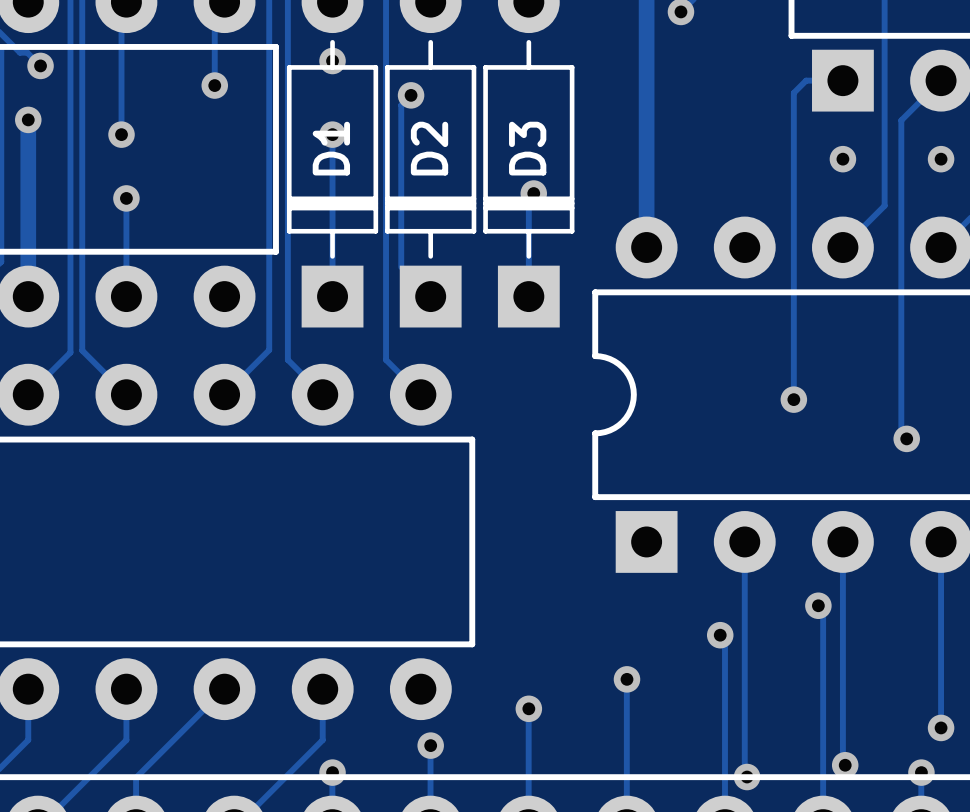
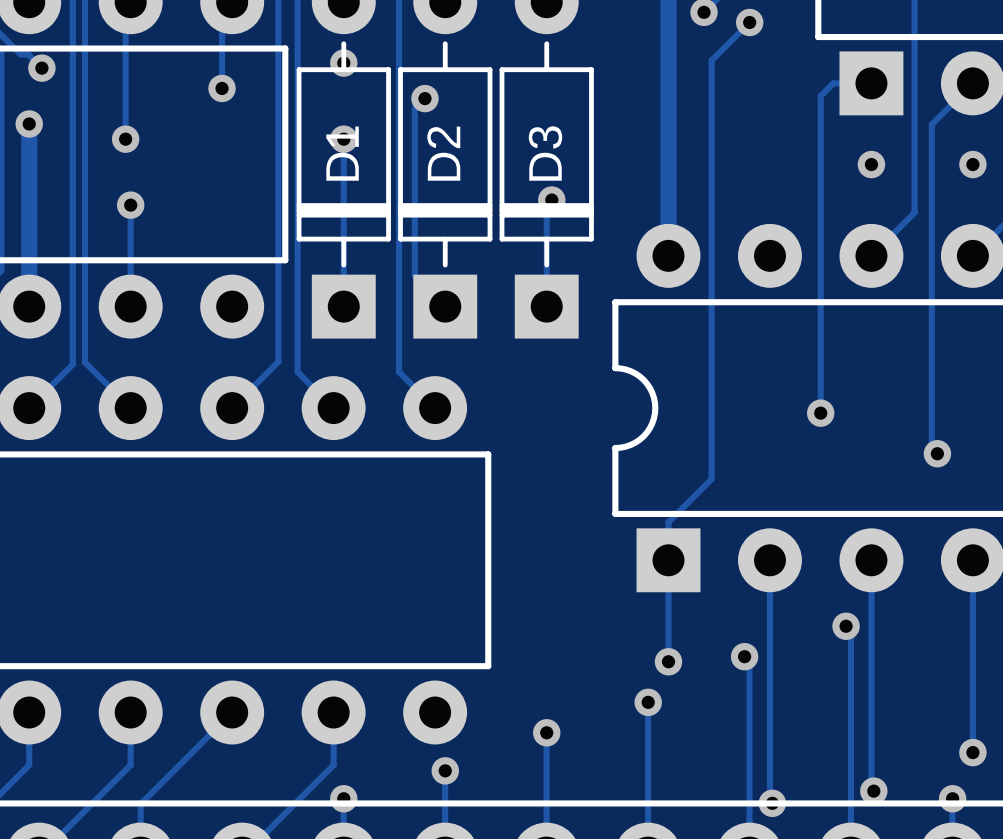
track: none -> (749, 22) (711, 60) (711, 479) (668, 522) (668, 661)
via: none -> (749, 22)
via: none -> (668, 661)

